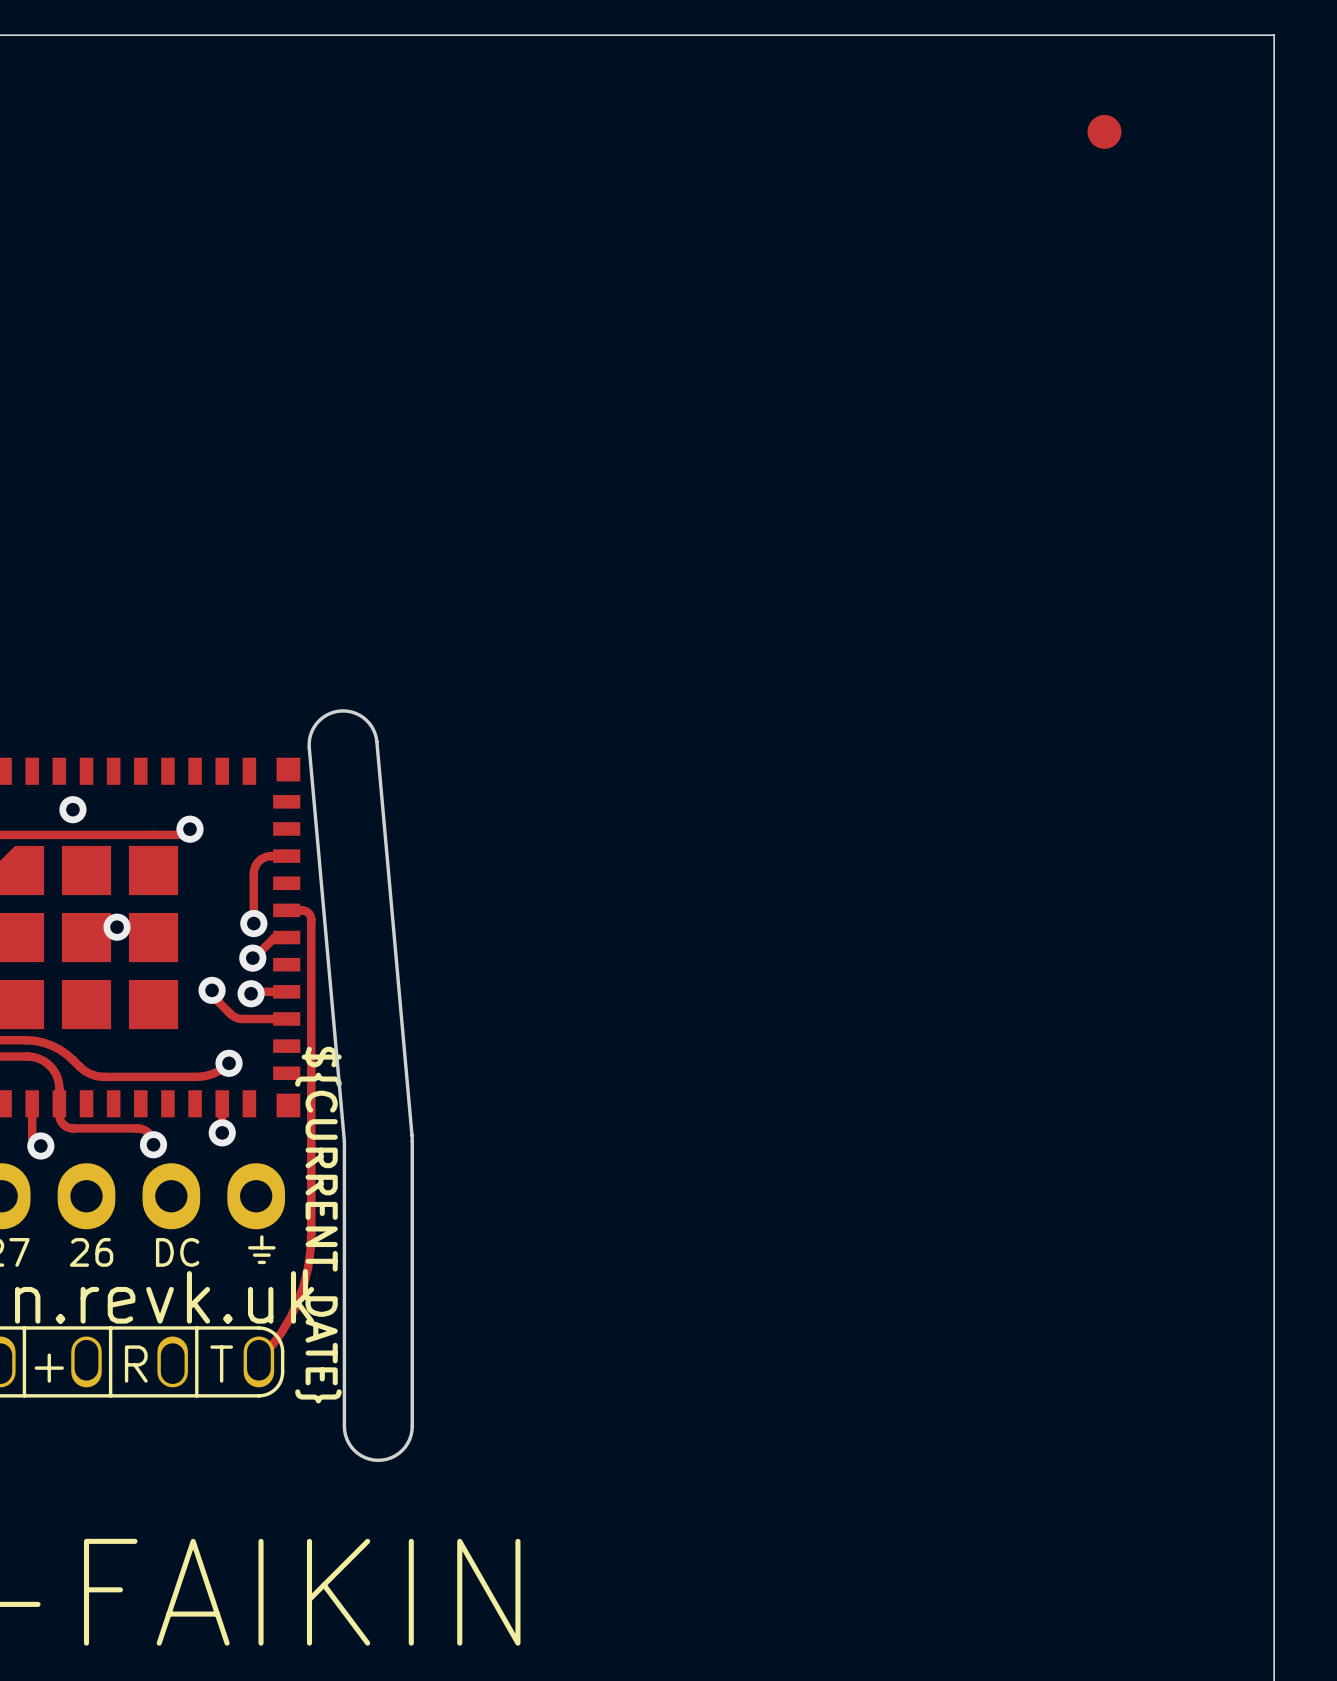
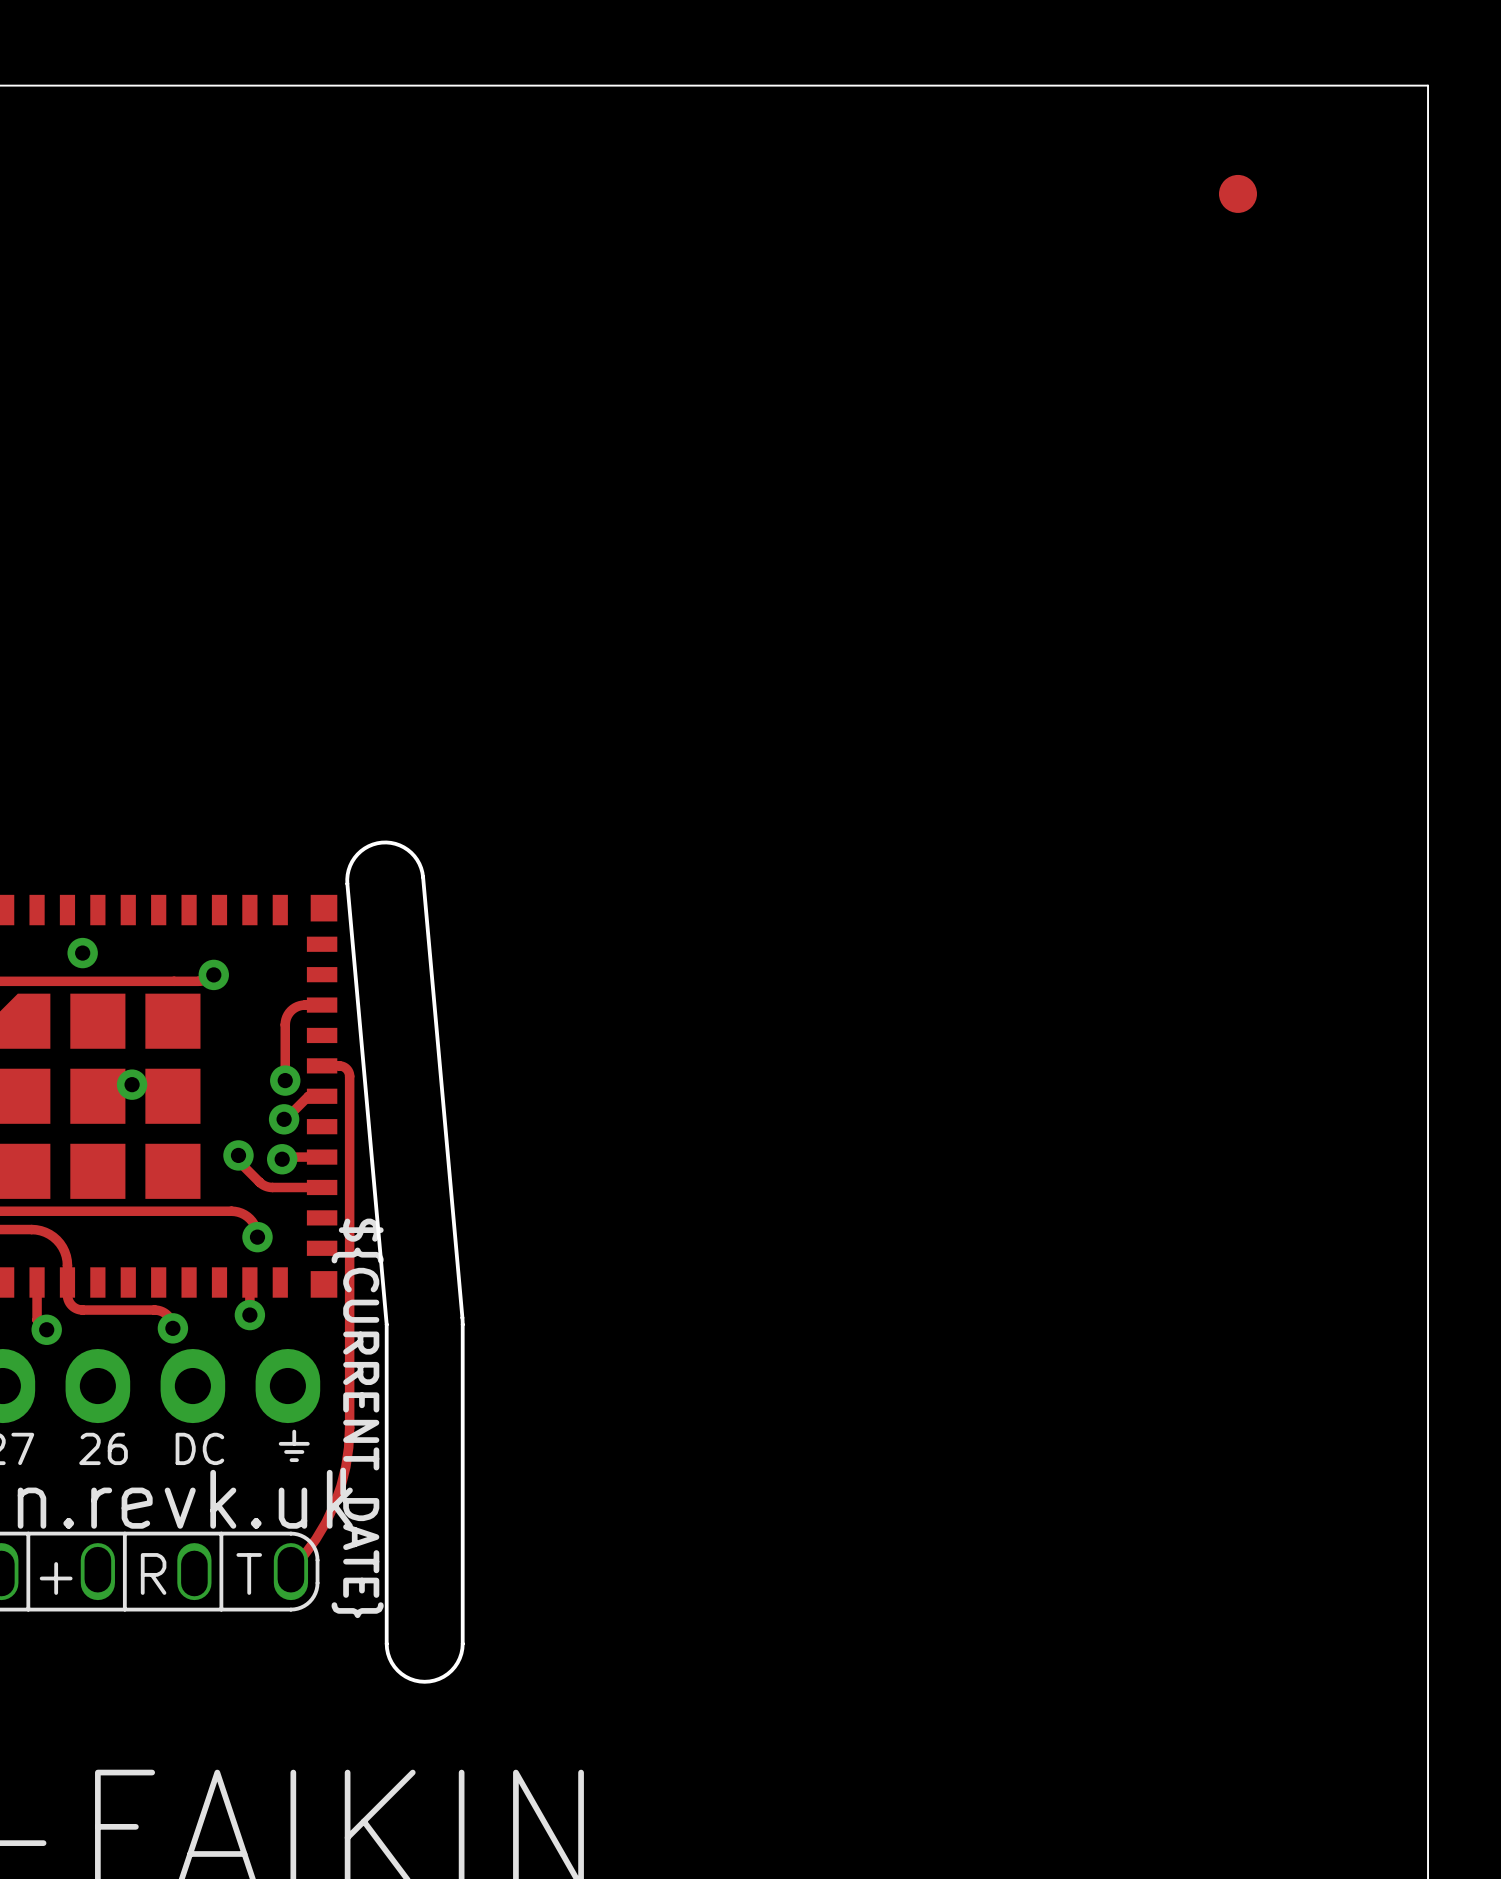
track: (25, 1040) (51, 1045) (66, 1054) (84, 1071) (100, 1076) (200, 1076) (213, 1073) (229, 1063) -> (29, 1211) (234, 1211) (244, 1214) (252, 1221) (257, 1237)

